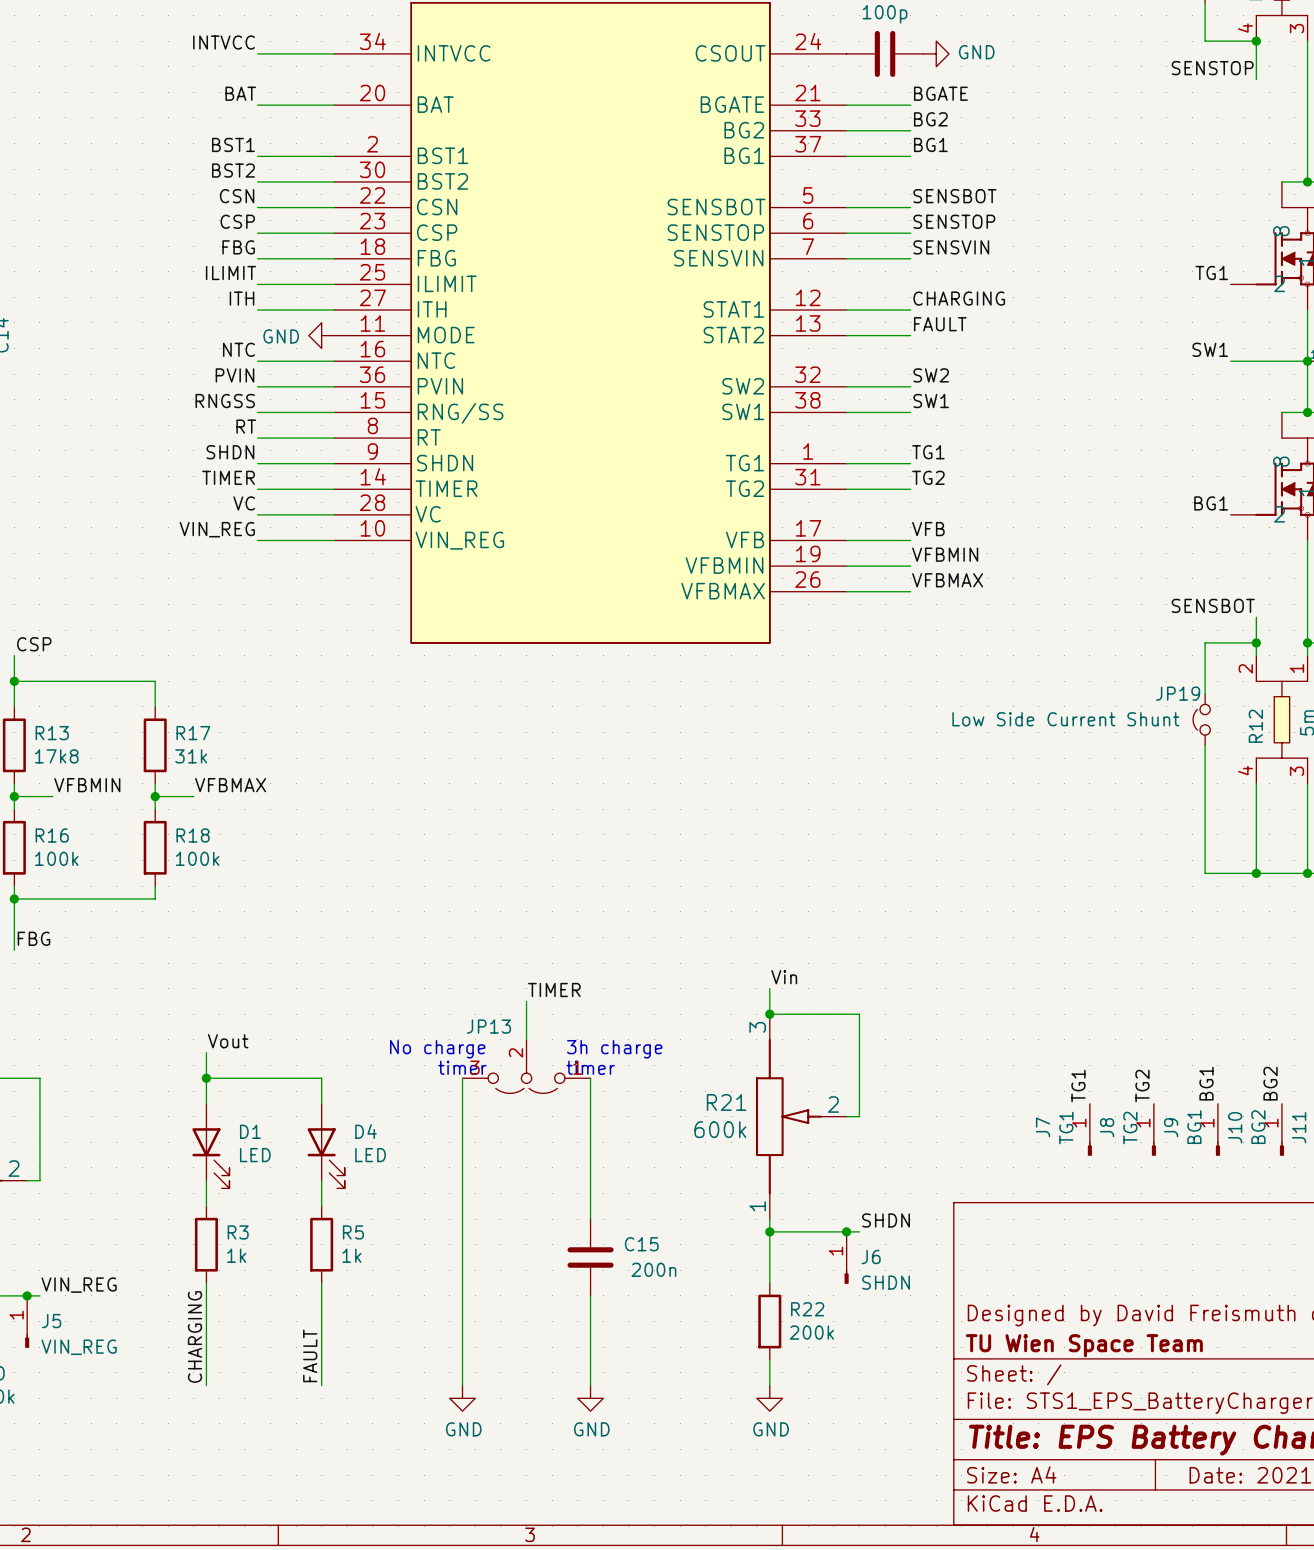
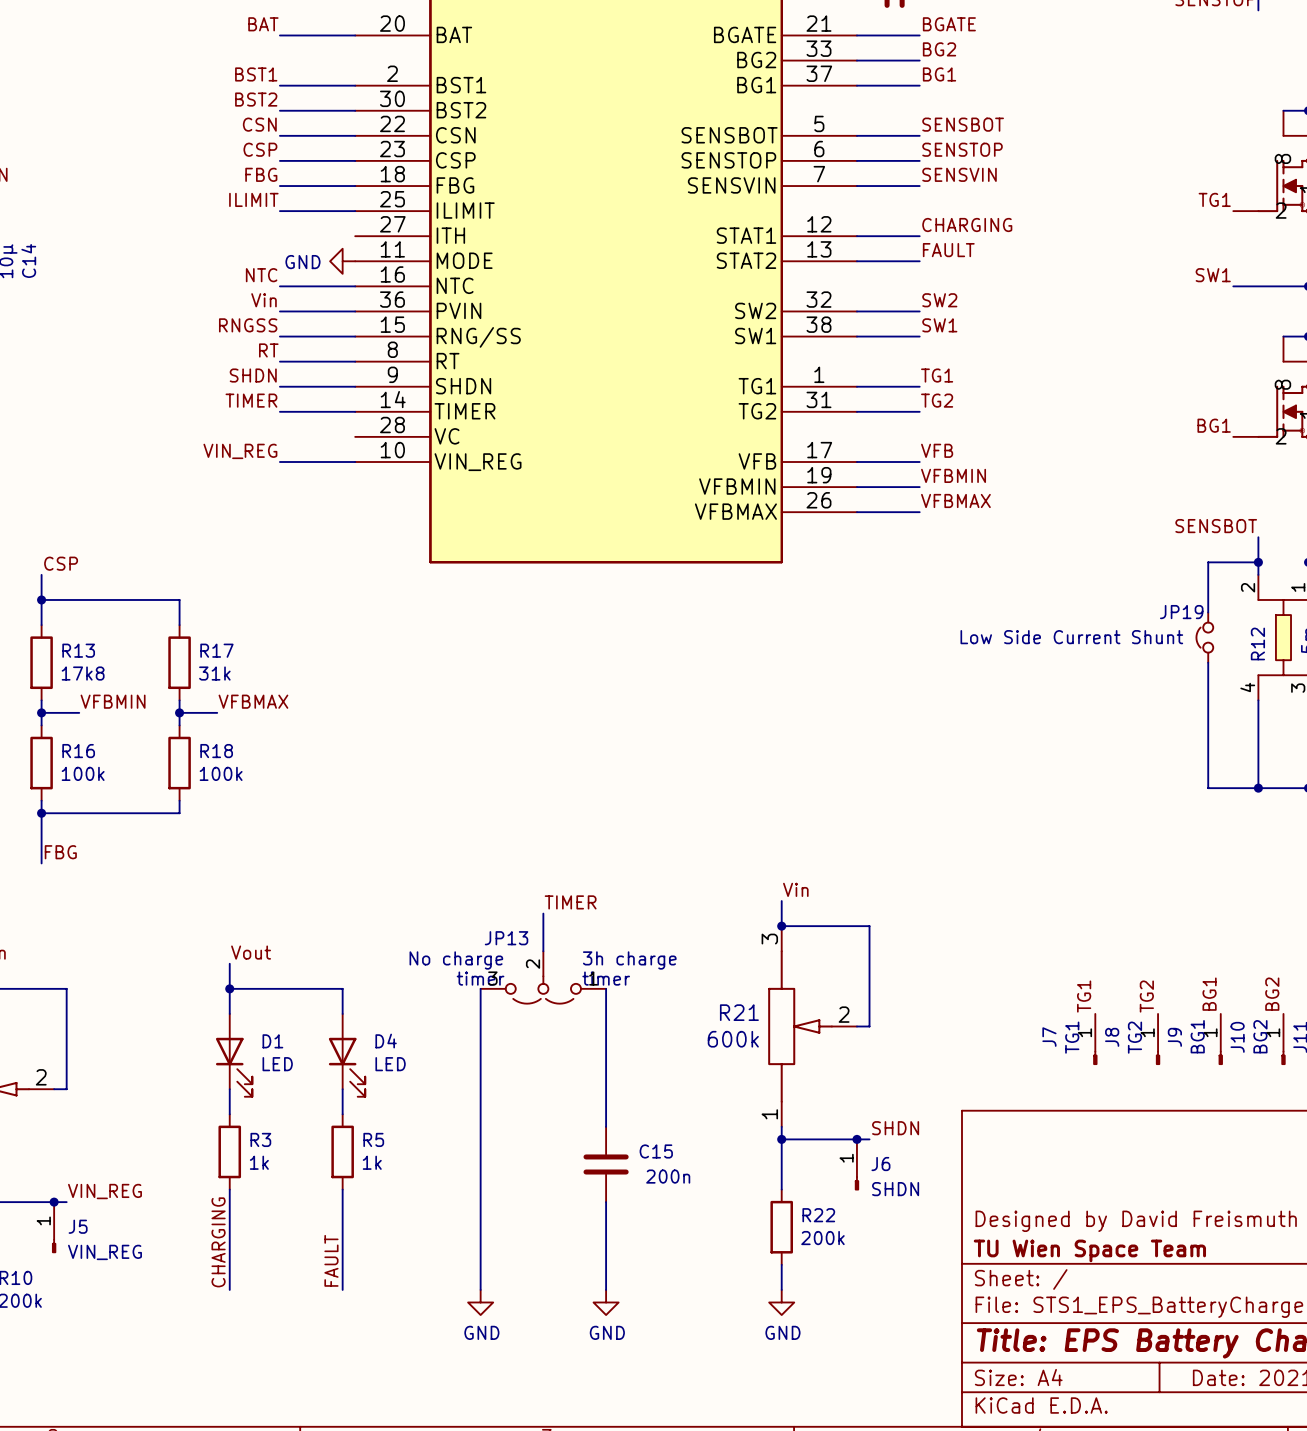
label: ITH (242, 298) -> none
wire: (257, 310) (334, 310) -> none
label: PVIN (234, 375) -> Vin (264, 300)
label: VC (244, 503) -> none
wire: (257, 514) (334, 514) -> none

